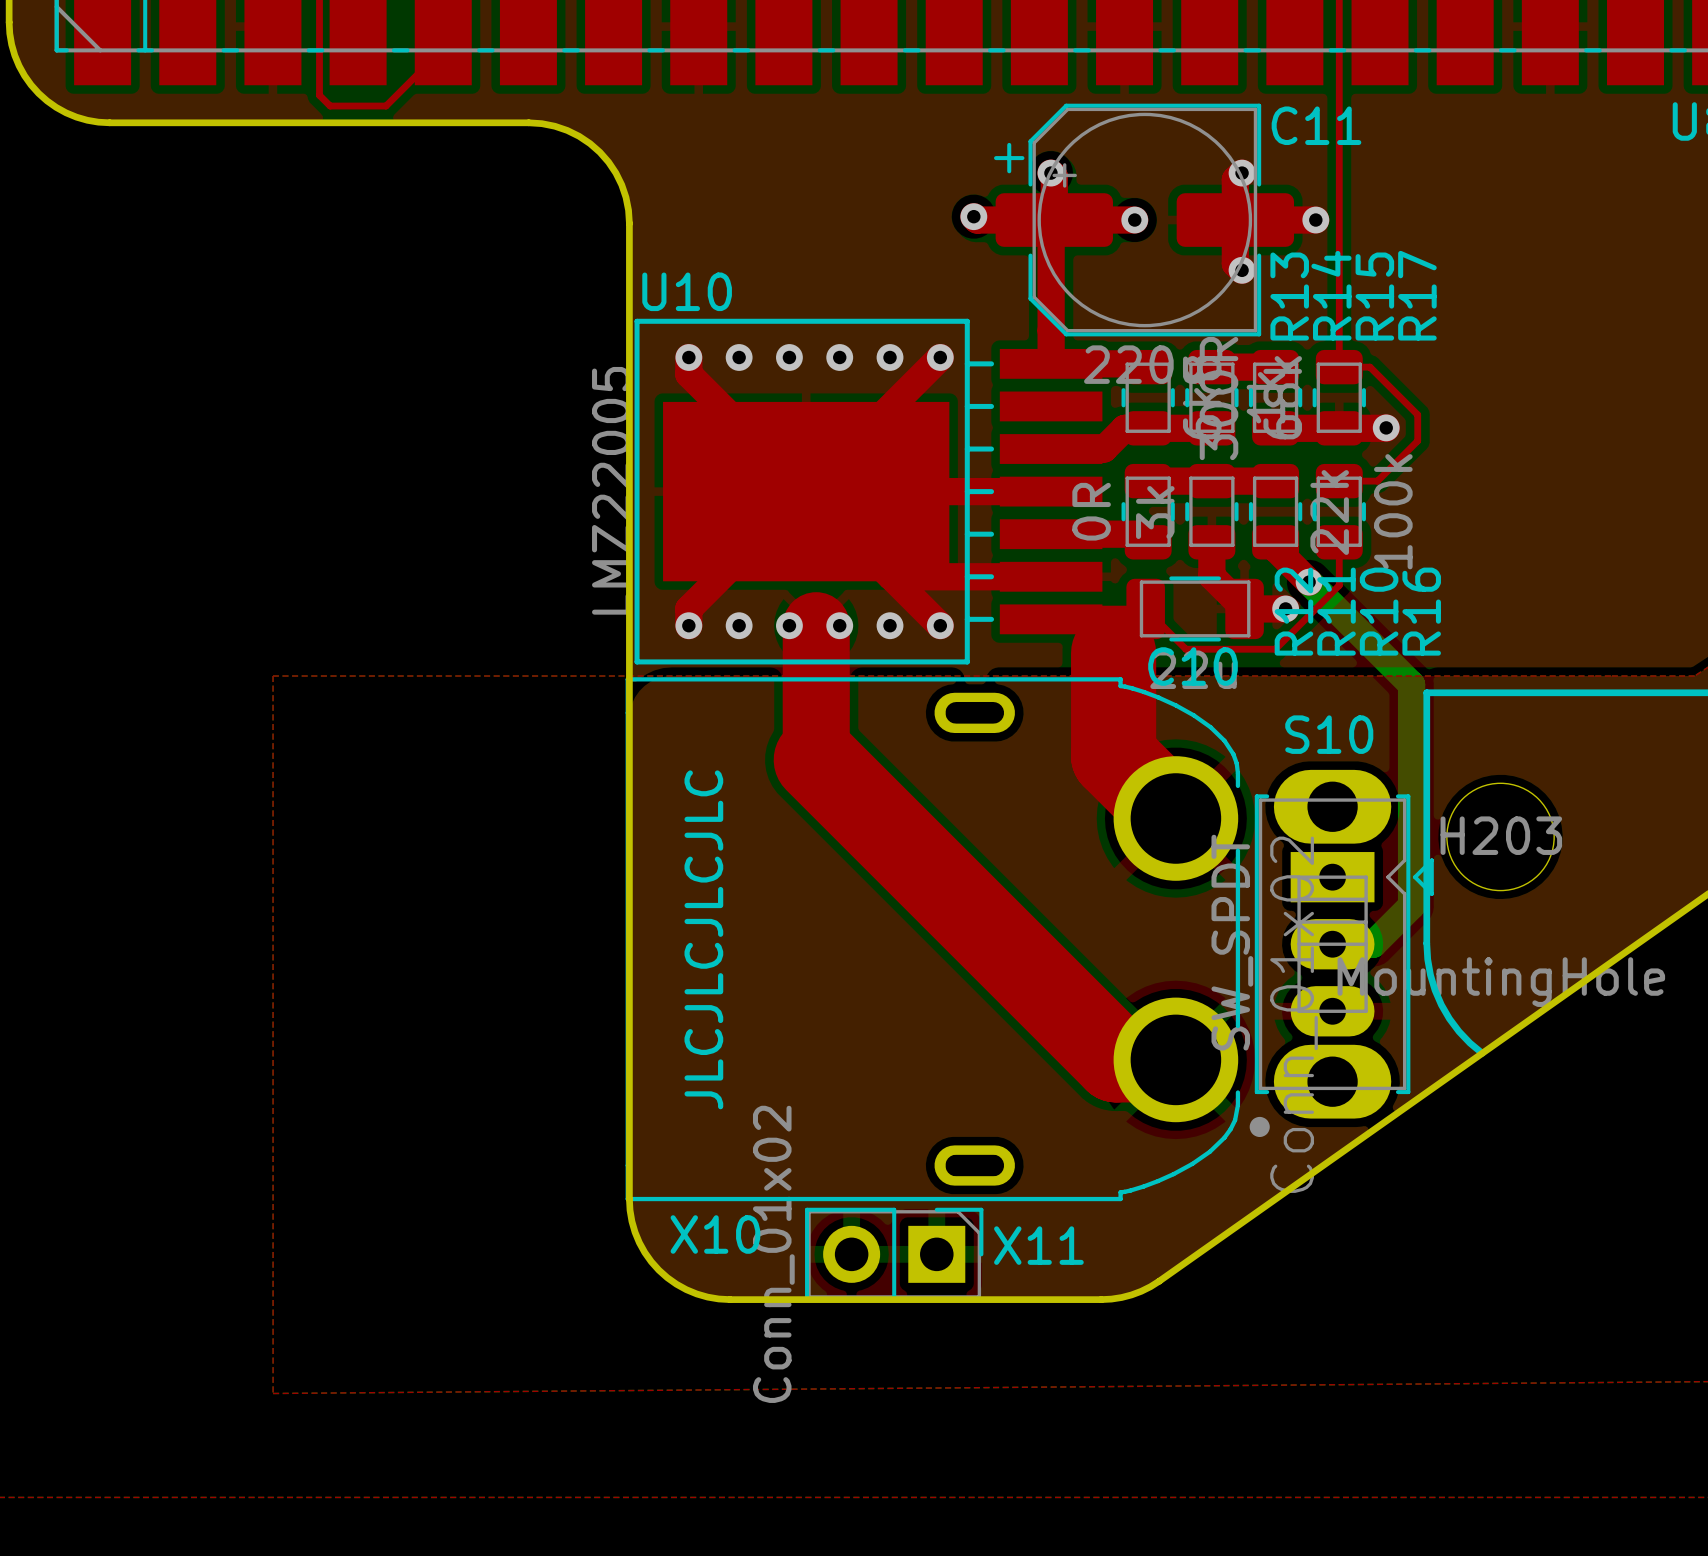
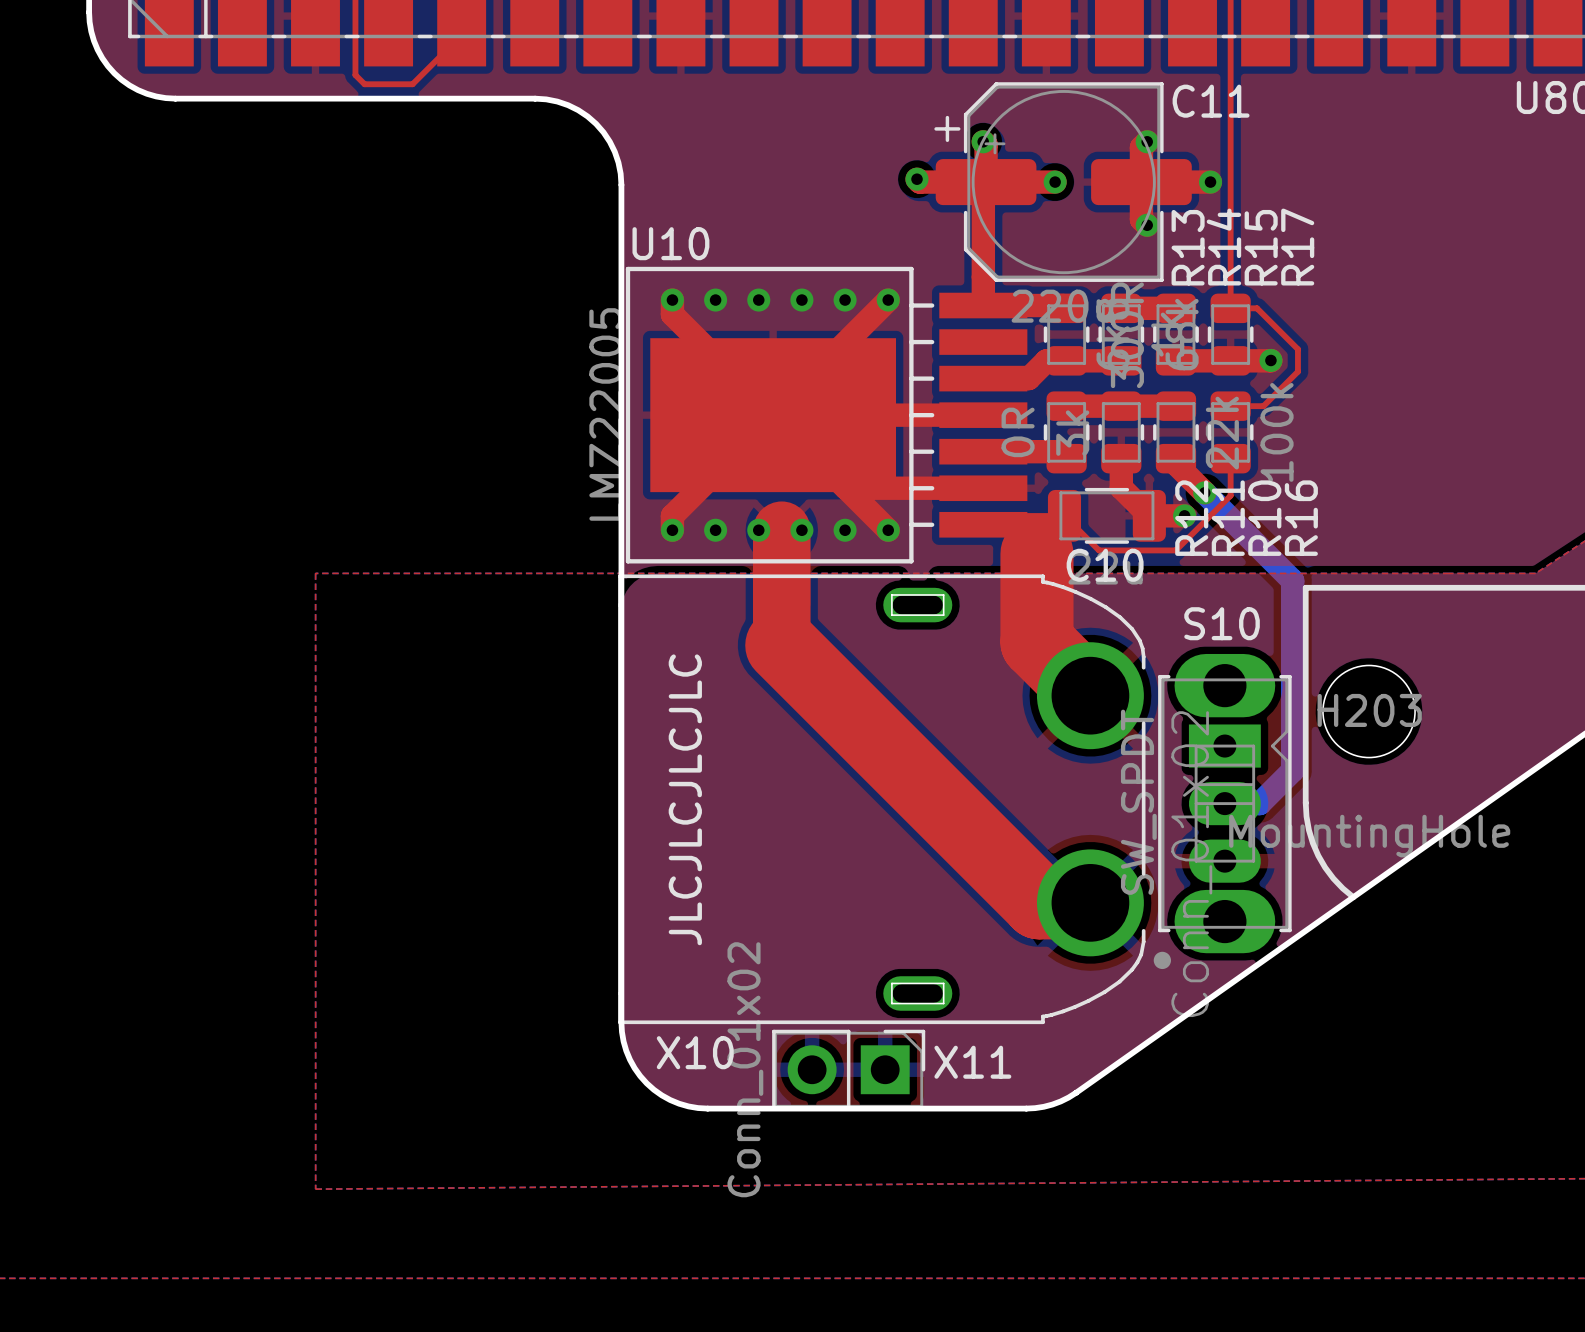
S10 footprint: [1254, 769, 1434, 1119] -> [1158, 653, 1292, 954]

